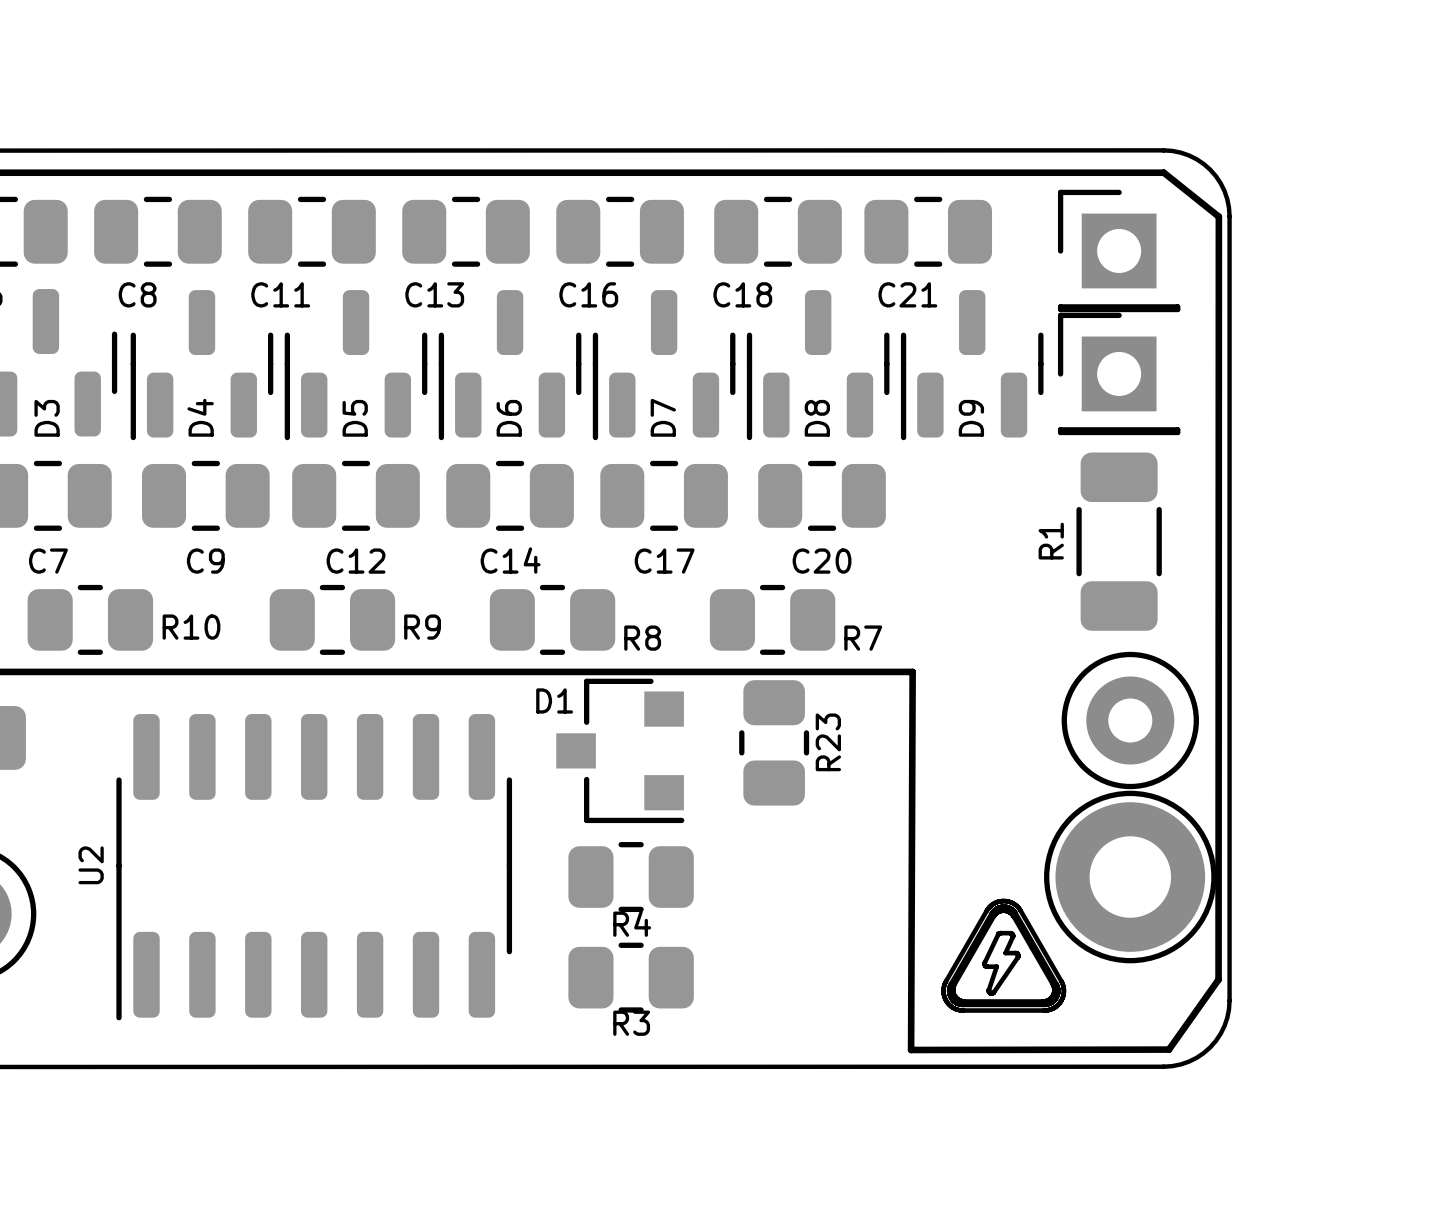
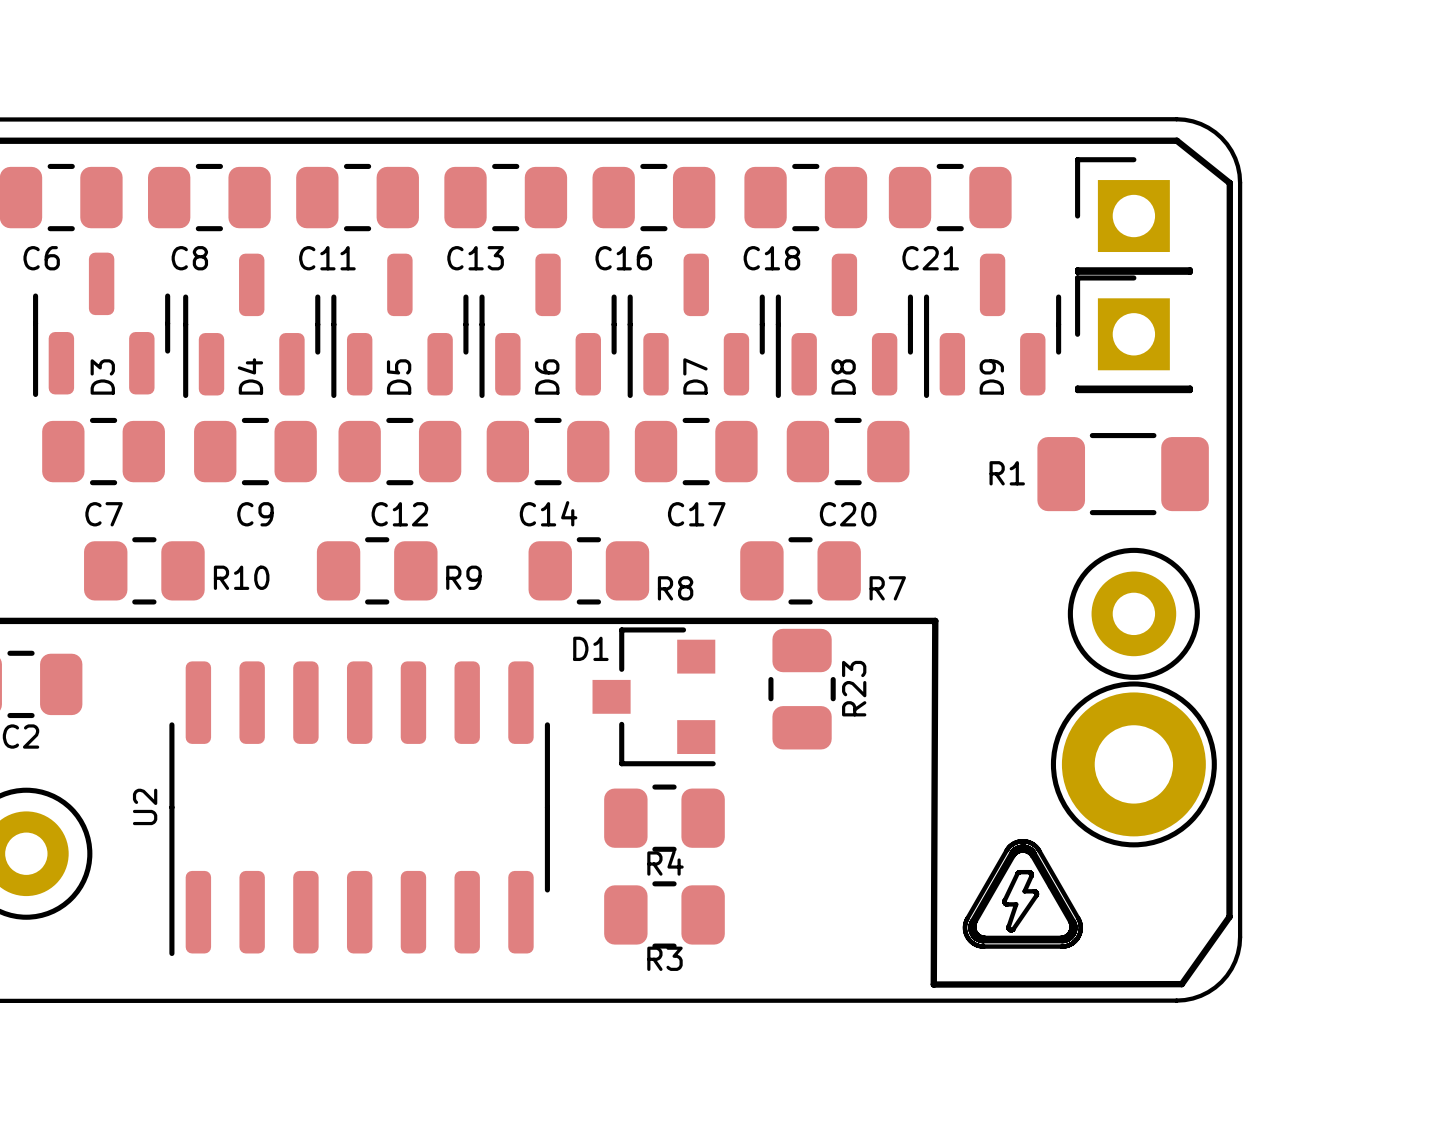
R1 rotation: 0° (1119, 541) -> 90° clockwise (1123, 474)
part position: (1130, 720) -> (1133, 613)
part position: (1130, 877) -> (1133, 764)

